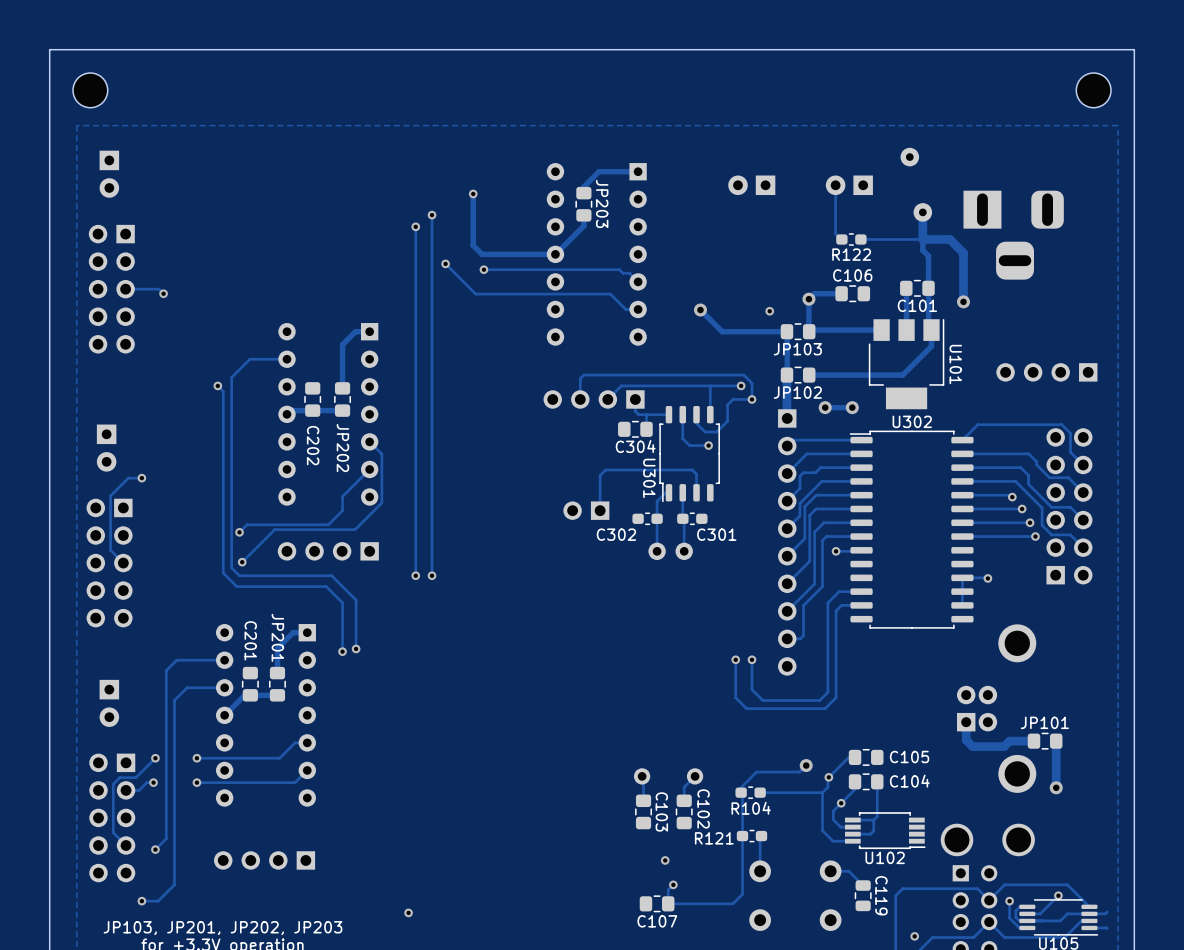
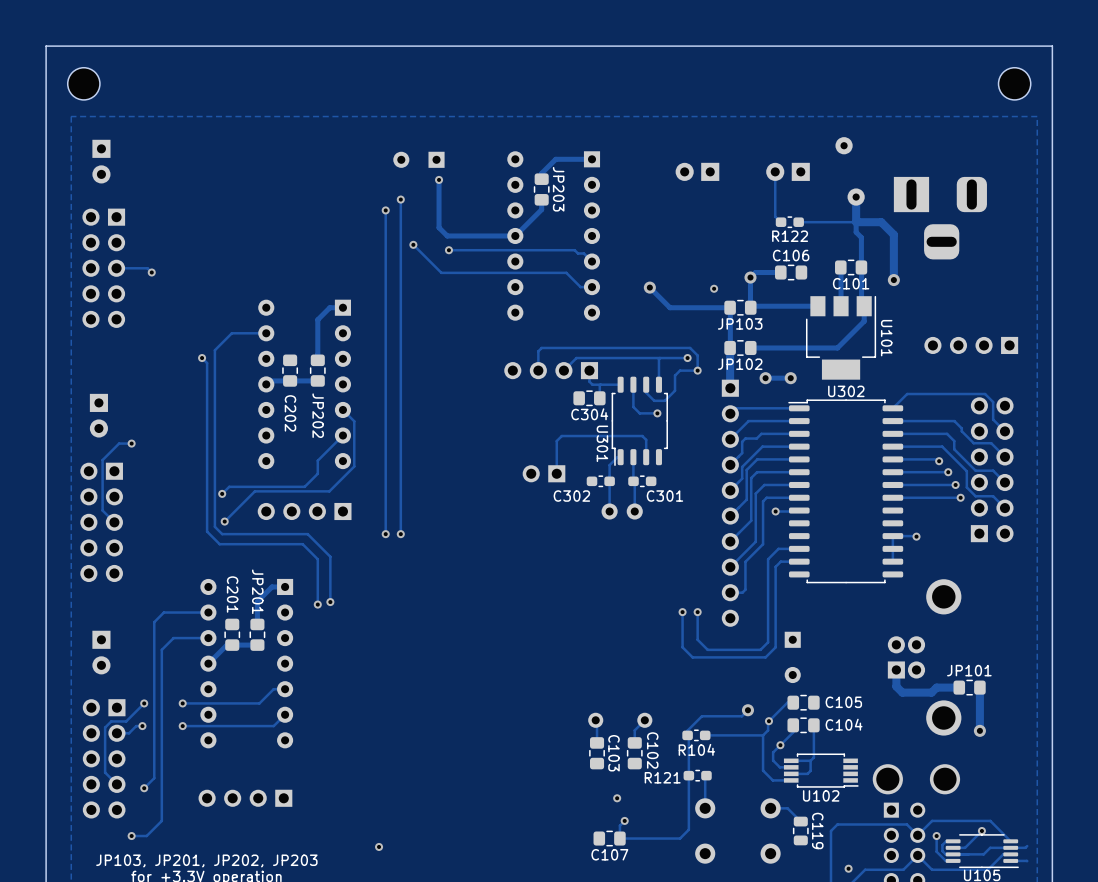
part: none -> (418, 159)
part: none -> (792, 657)

